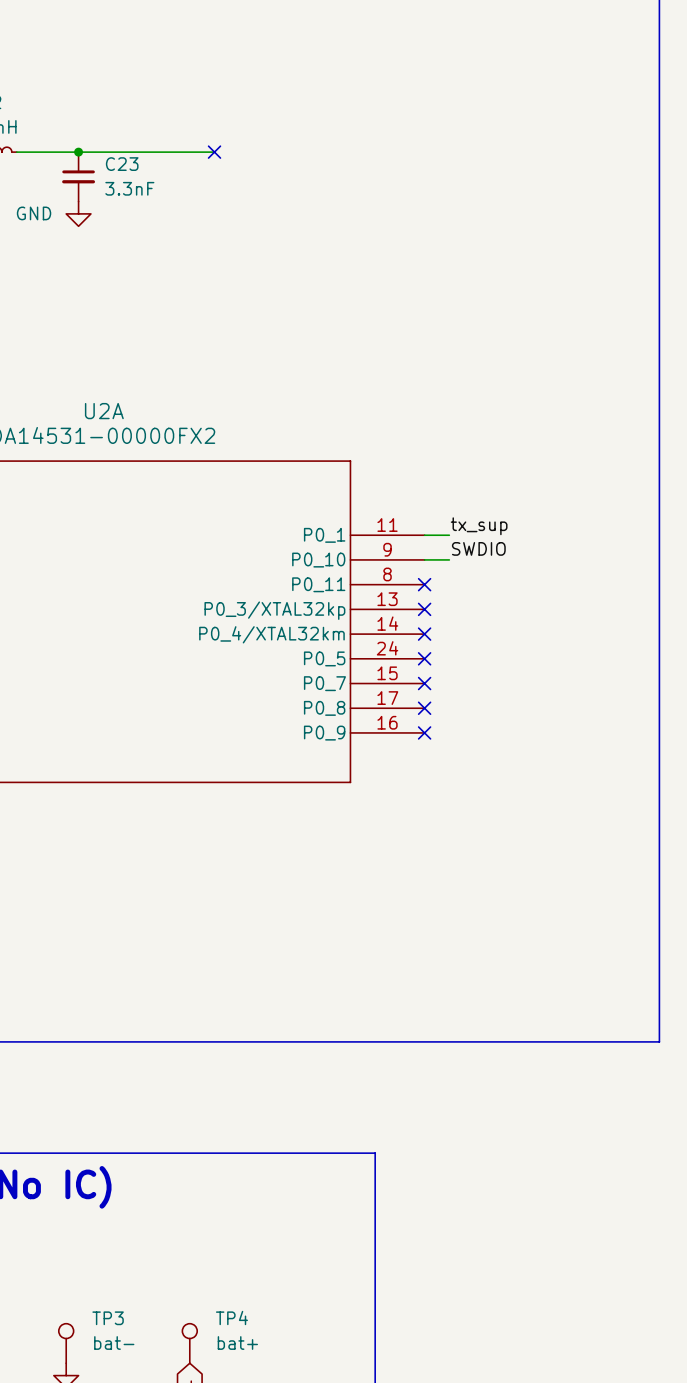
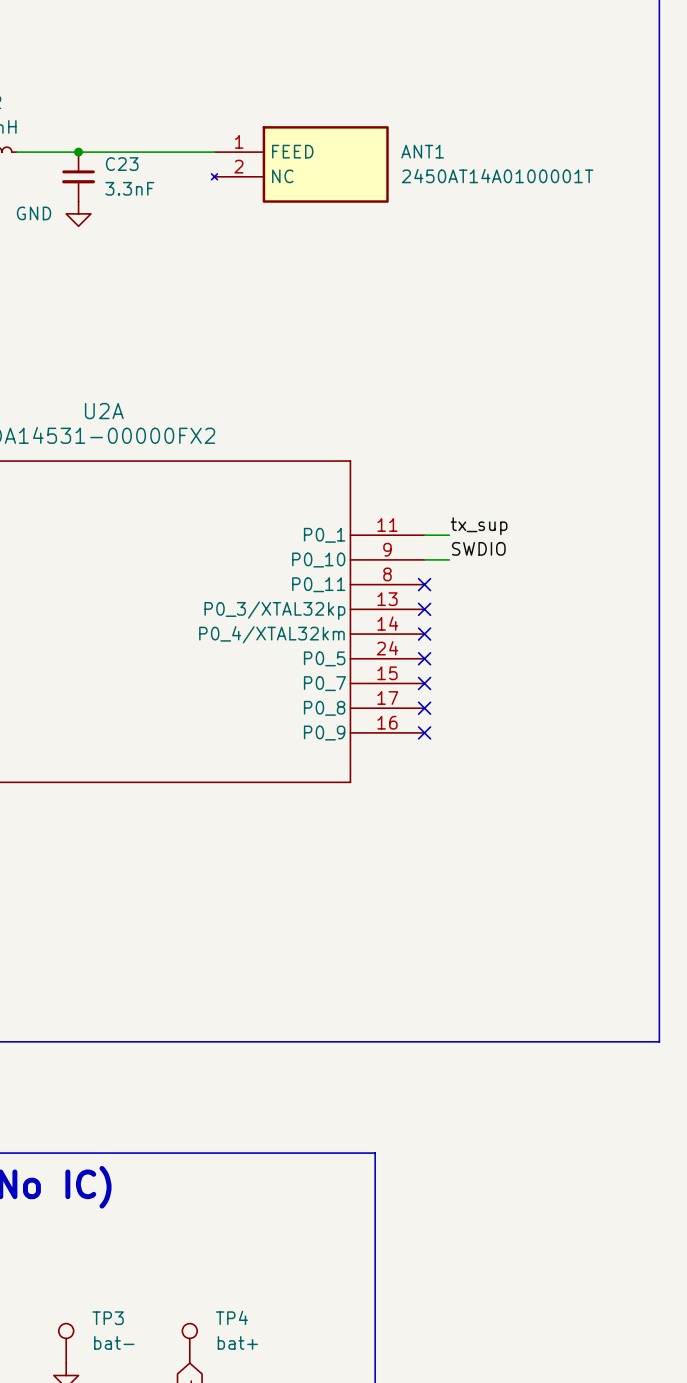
no-connect mark: (214, 152) -> none
ANT1: none -> 2450AT14A0100001T (300, 164)

